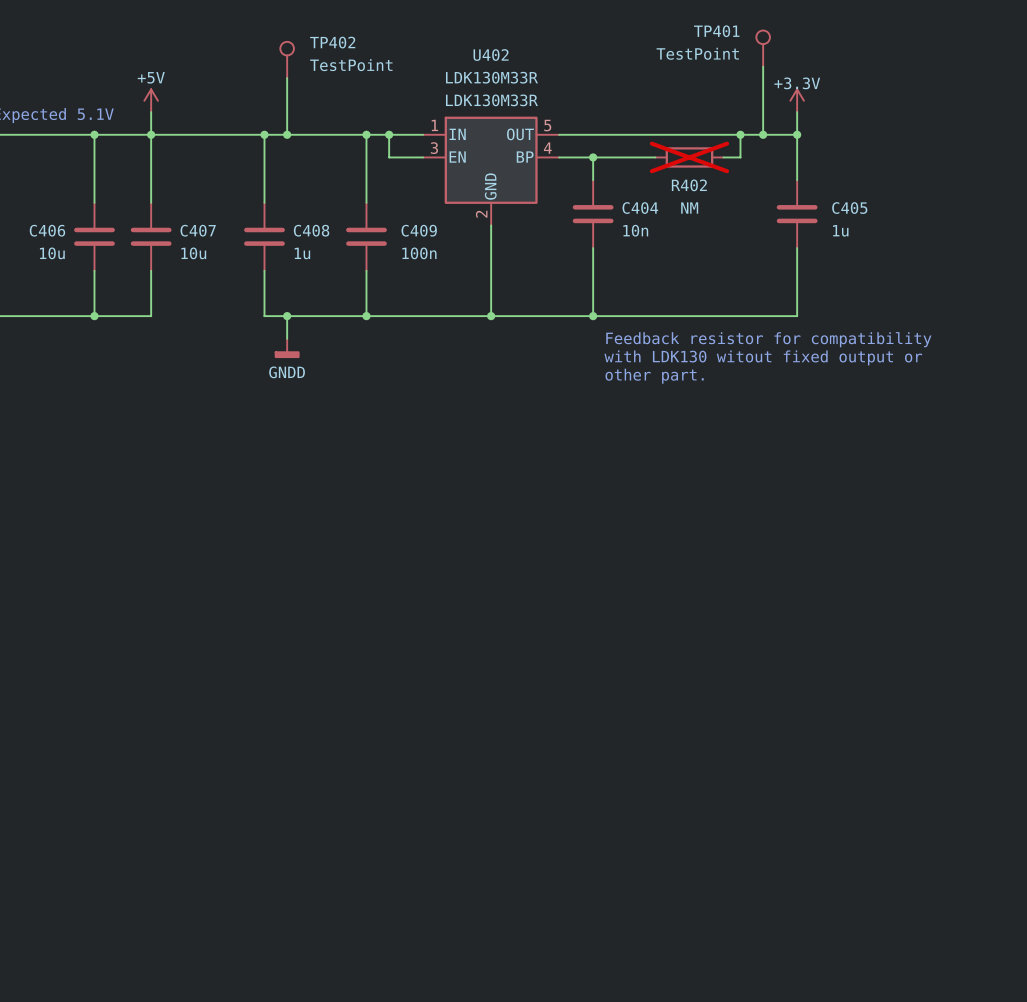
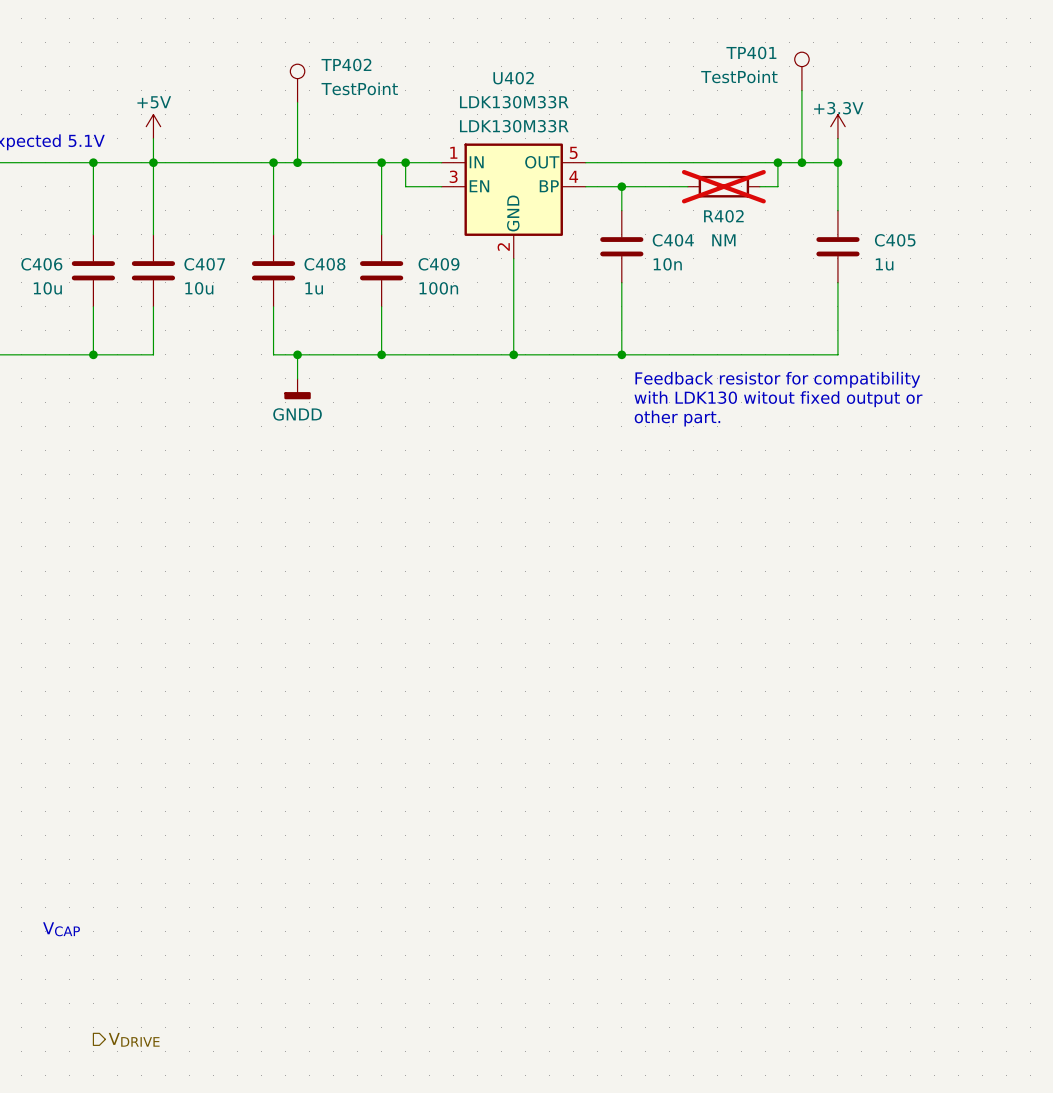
text: none -> VCAP (61, 929)
hierarchical label: none -> VDRIVE (134, 1039)

